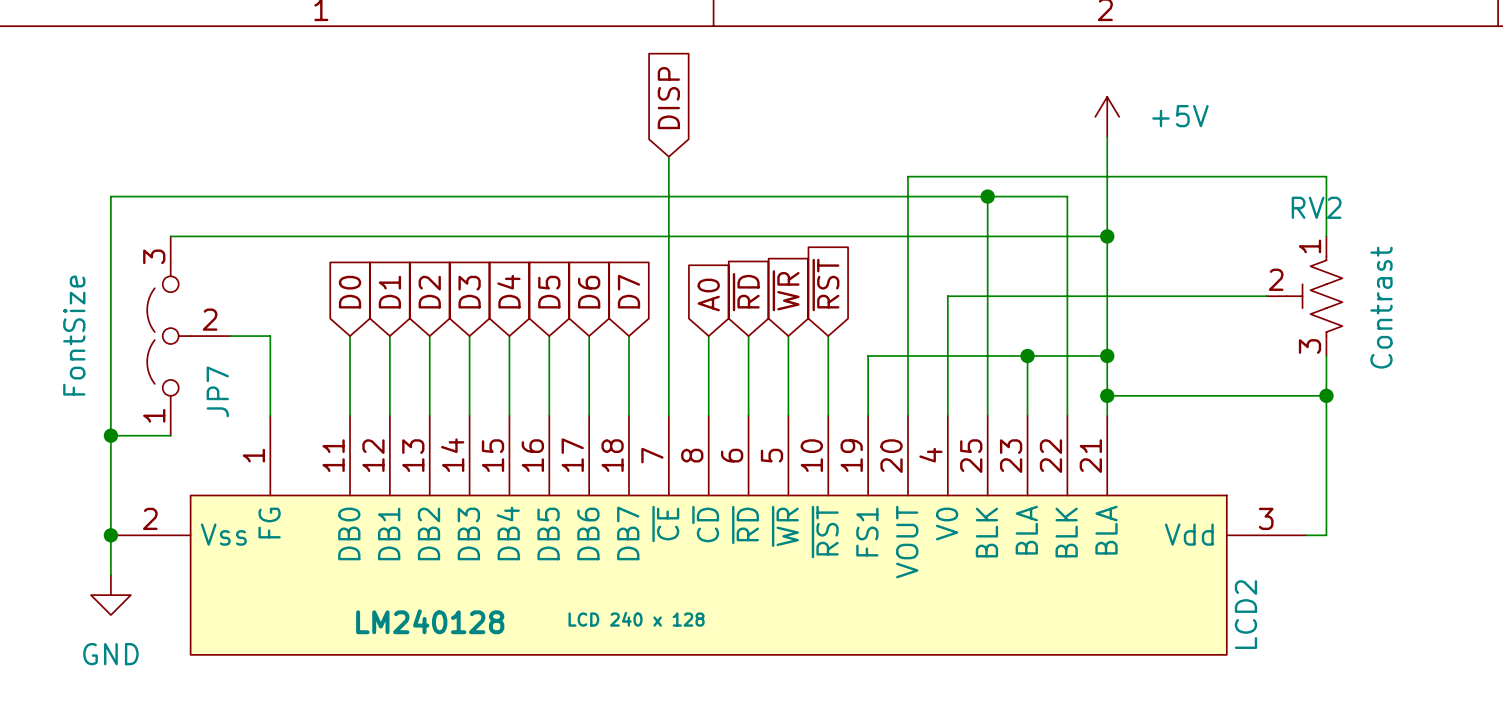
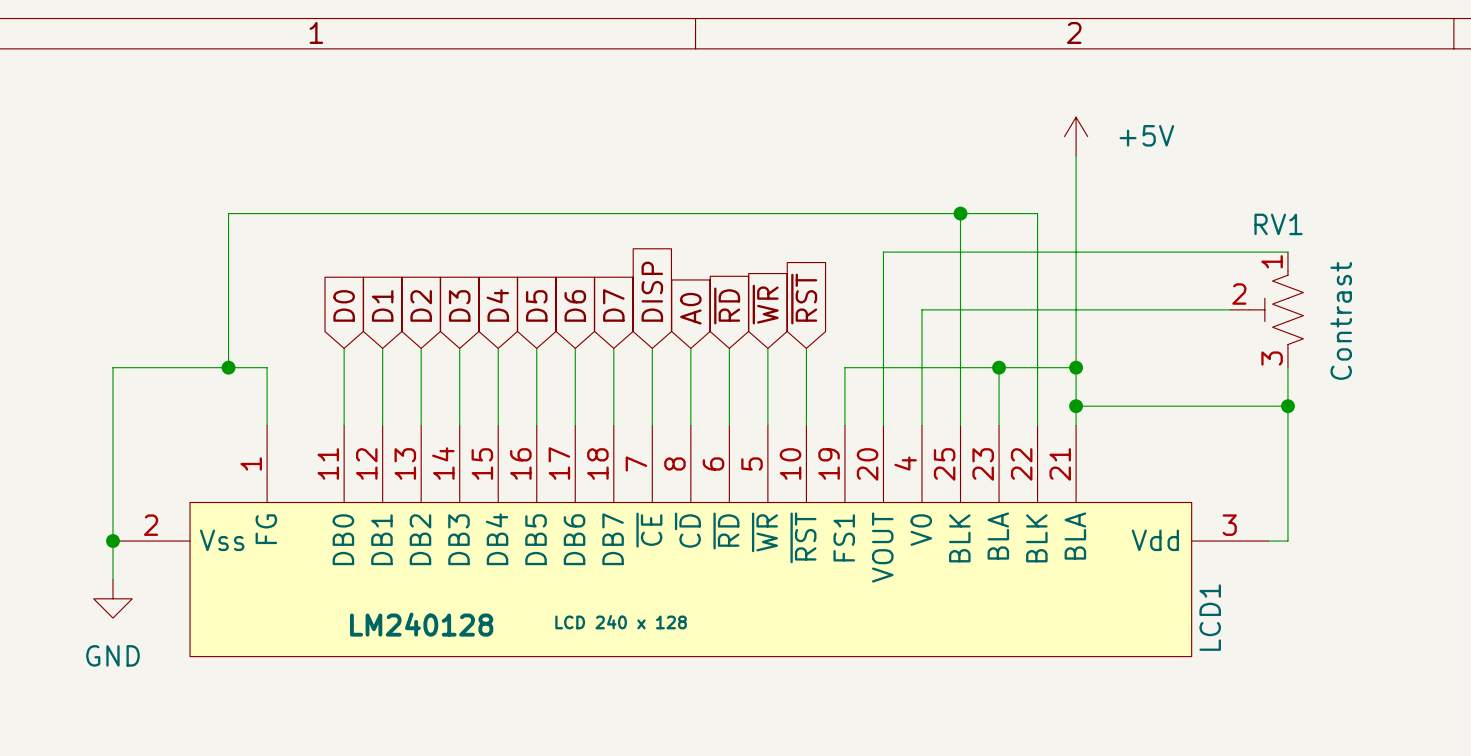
global label position: DISP (668, 98) -> DISP (652, 291)
wire: (668, 156) (668, 336) -> none
wire: (230, 196) (110, 196) (110, 355) -> (228, 213) (228, 367)
RV2 name: RV2 (1316, 207) -> RV1 (1278, 224)
wire: (170, 236) (907, 236) (907, 176) (1326, 176) (1326, 236) -> (1076, 252) (1287, 252)
junction: (1107, 236) -> none
JP7: FontSize (188, 336) -> none
wire: (230, 336) (270, 336) (270, 355) -> (112, 367) (267, 367)
junction: none -> (228, 367)
wire: (110, 435) (170, 435) -> none
junction: (110, 435) -> none
LCD2 name: LCD2 (1245, 614) -> LCD1 (1210, 617)

